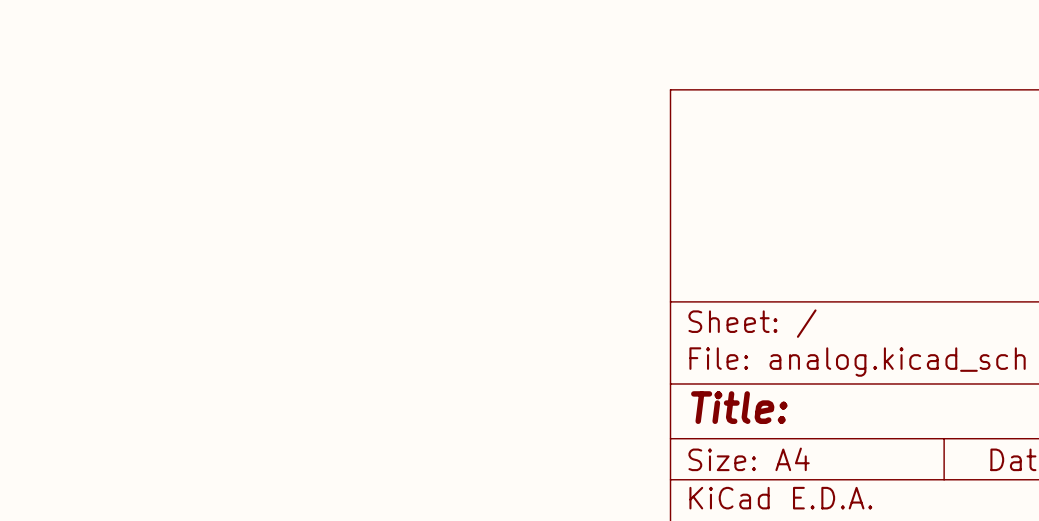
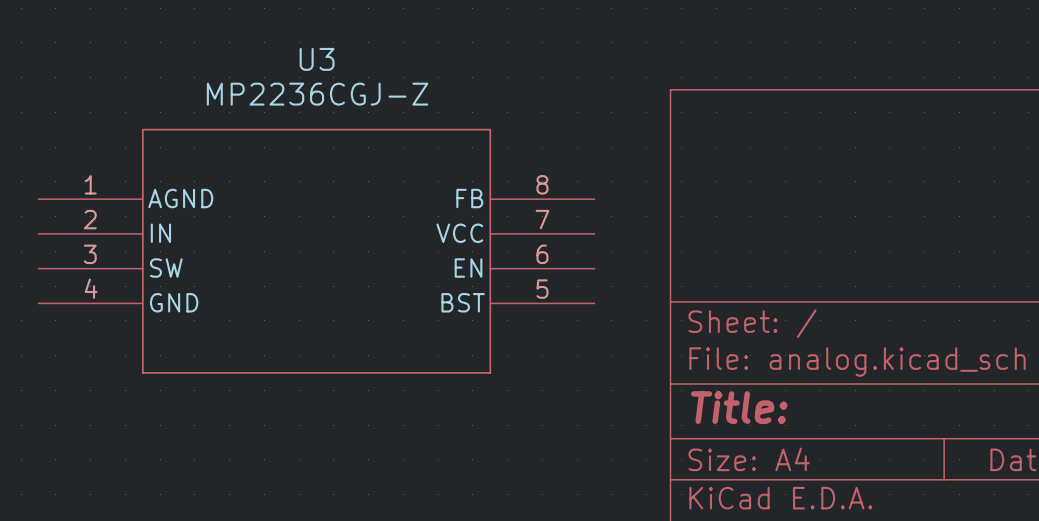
U3: none -> MP2236CGJ-Z (316, 251)

